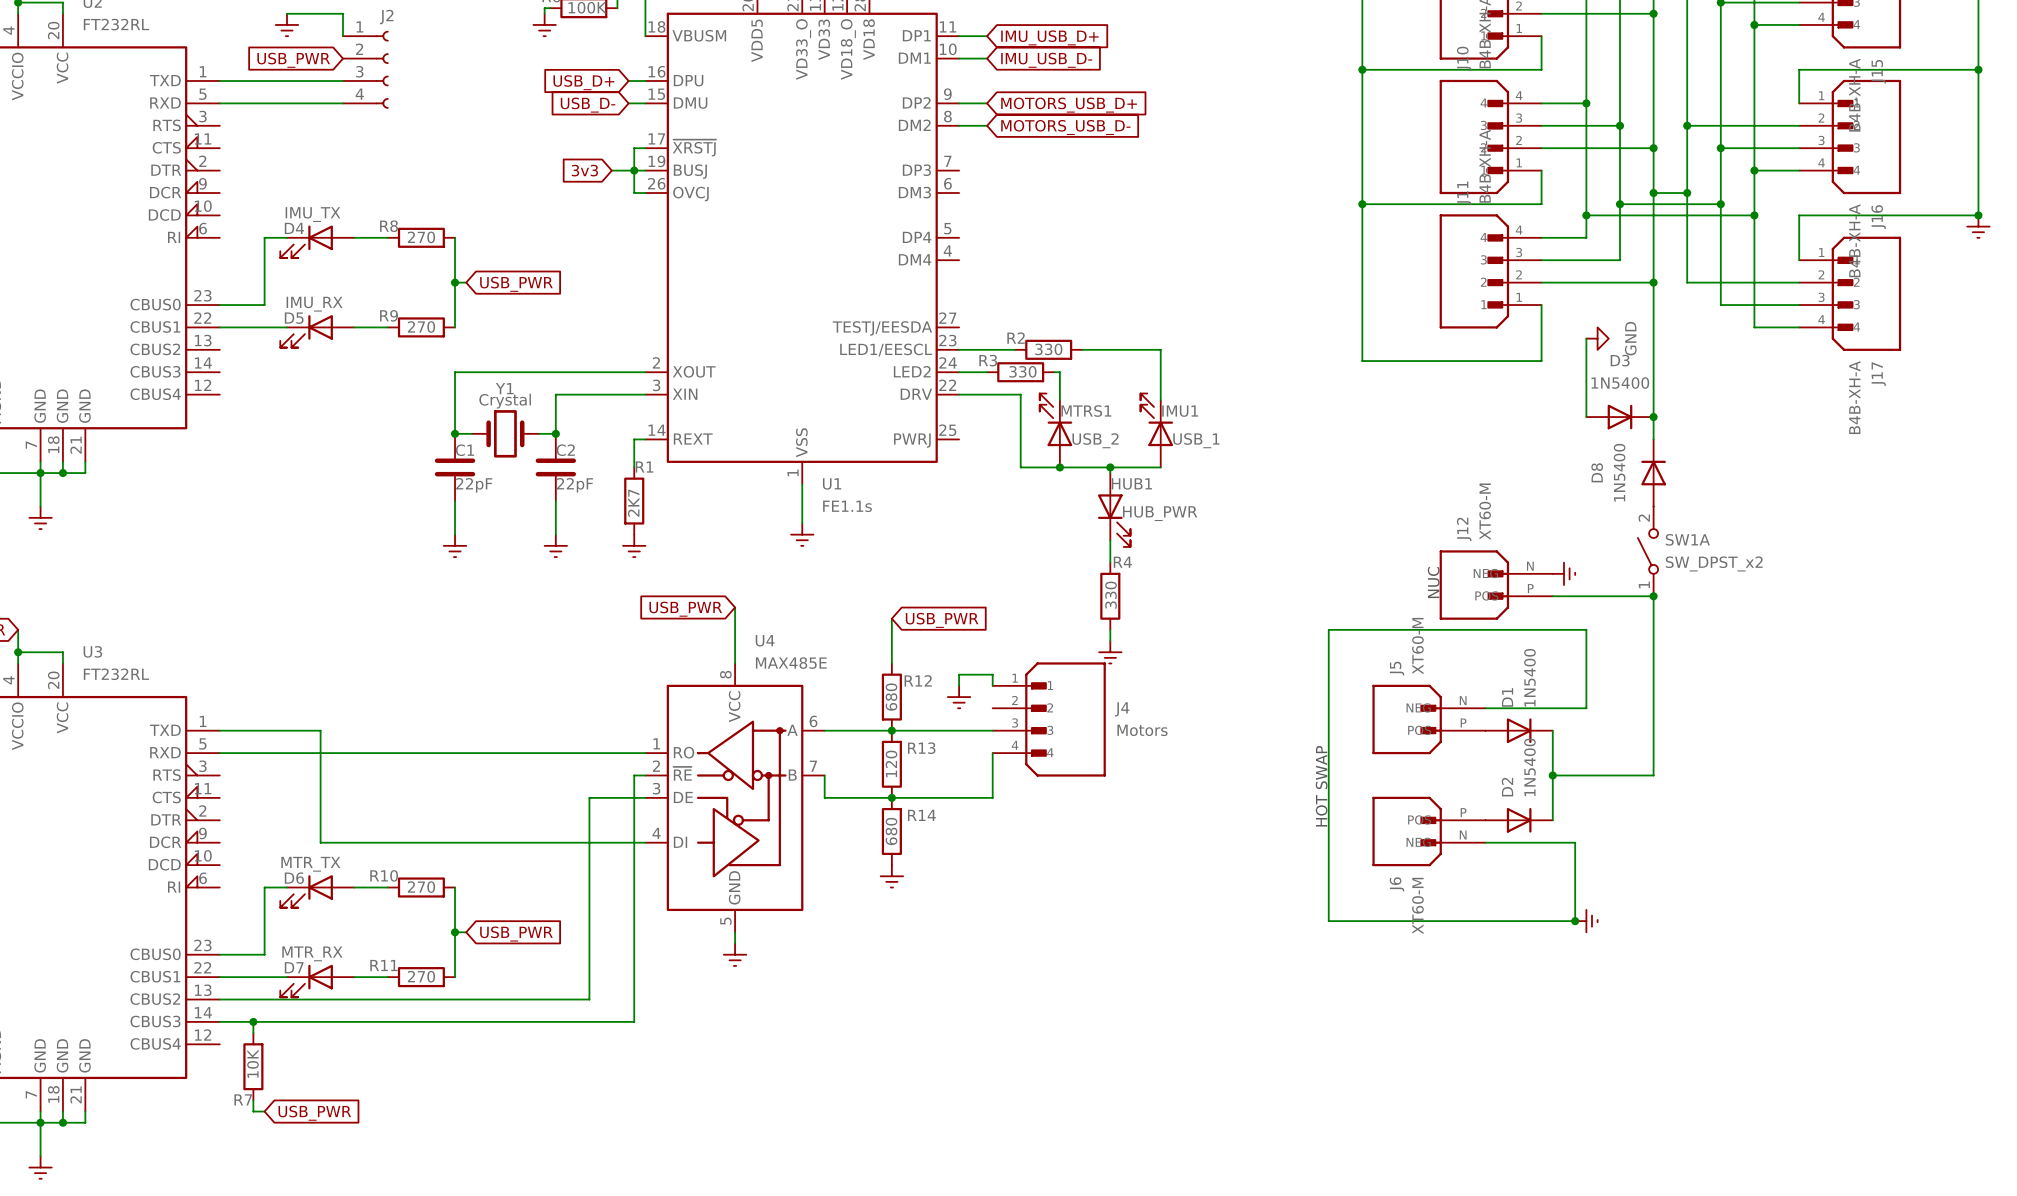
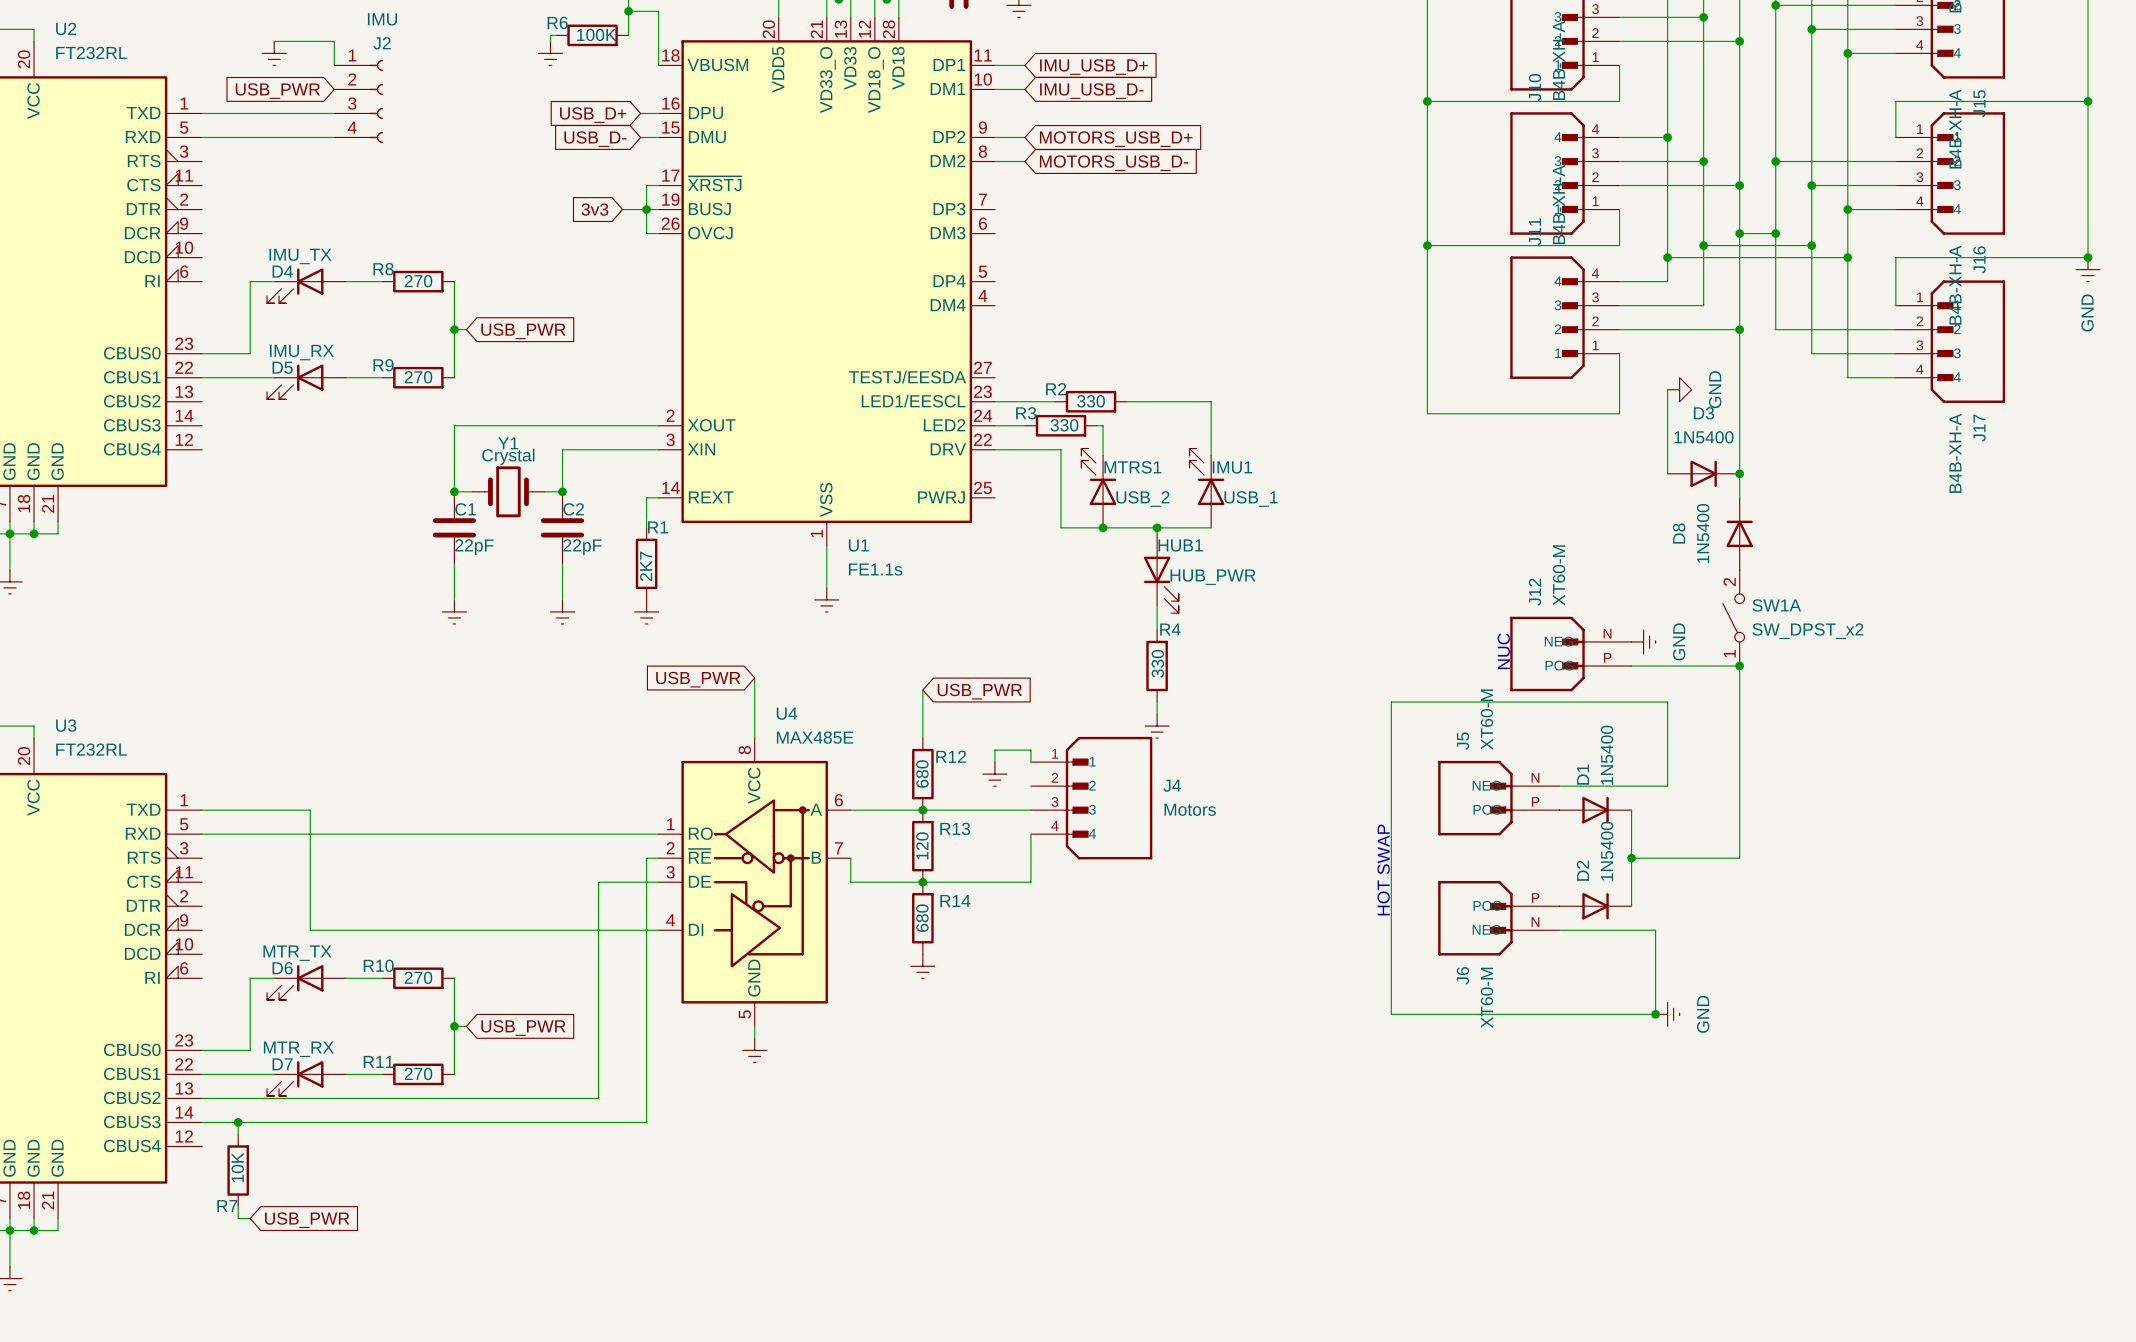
power symbol text: none -> GND (2087, 313)
power symbol text: none -> GND (1679, 641)
power symbol text: none -> GND (1703, 1014)

